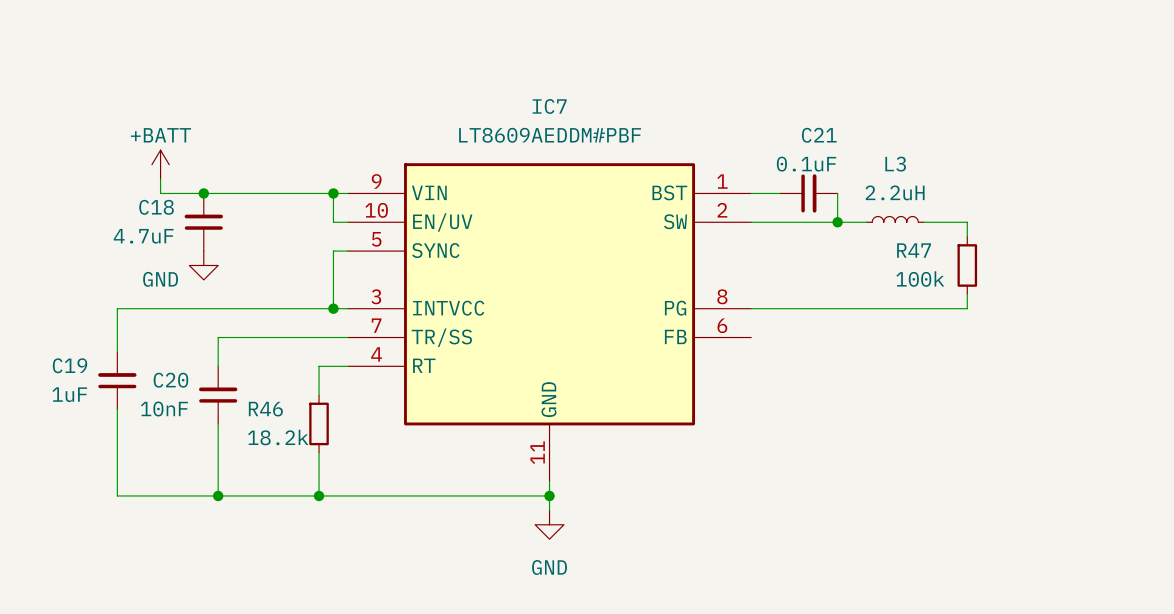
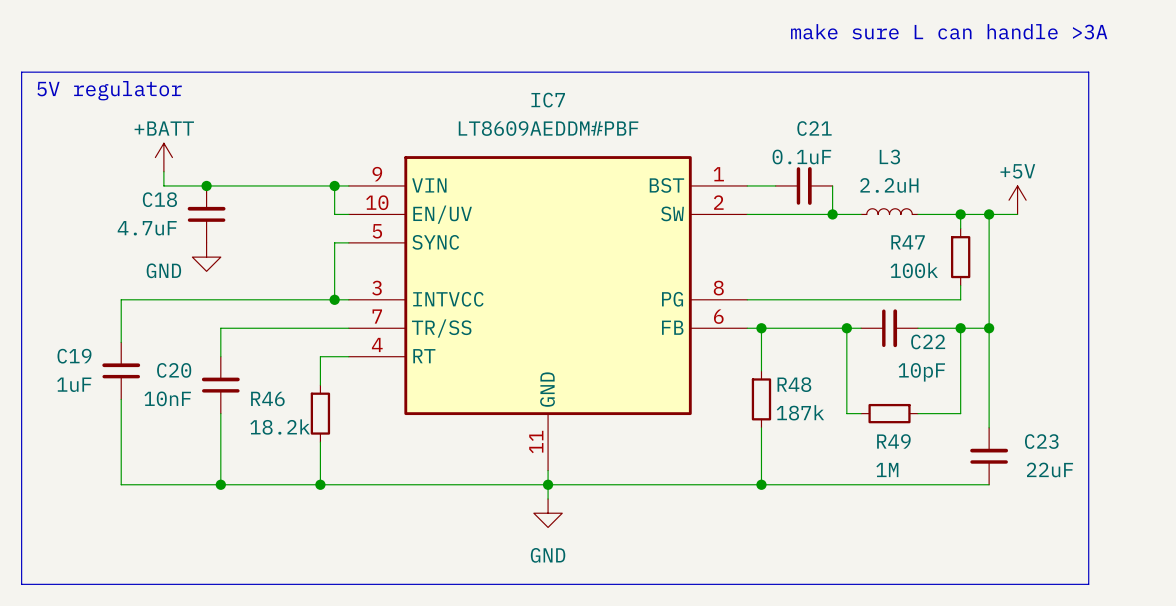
text: none -> make sure L can handle >3A (949, 31)
line: none -> (21, 72) (1088, 72) (1088, 584) (21, 584) (21, 72)
text: none -> 5V regulator (109, 90)
power symbol: none -> +5V (1017, 200)
wire: none -> (960, 214) (1017, 214)
junction: none -> (960, 214)
wire: none -> (989, 214) (989, 427)
junction: none -> (989, 214)
wire: none -> (747, 328) (861, 328)
wire: none -> (761, 328) (761, 370)
junction: none -> (761, 328)
wire: none -> (846, 328) (846, 413) (861, 413)
junction: none -> (846, 328)
C22: none -> 10pF (889, 328)
wire: none -> (917, 328) (989, 328)
wire: none -> (960, 328) (960, 413) (917, 413)
junction: none -> (960, 328)
junction: none -> (989, 328)
R48: none -> 187k (761, 399)
R49: none -> 1M (889, 413)
wire: none -> (761, 427) (761, 484)
C23: none -> 22uF (989, 456)
wire: none -> (548, 484) (989, 484)
junction: none -> (761, 484)

